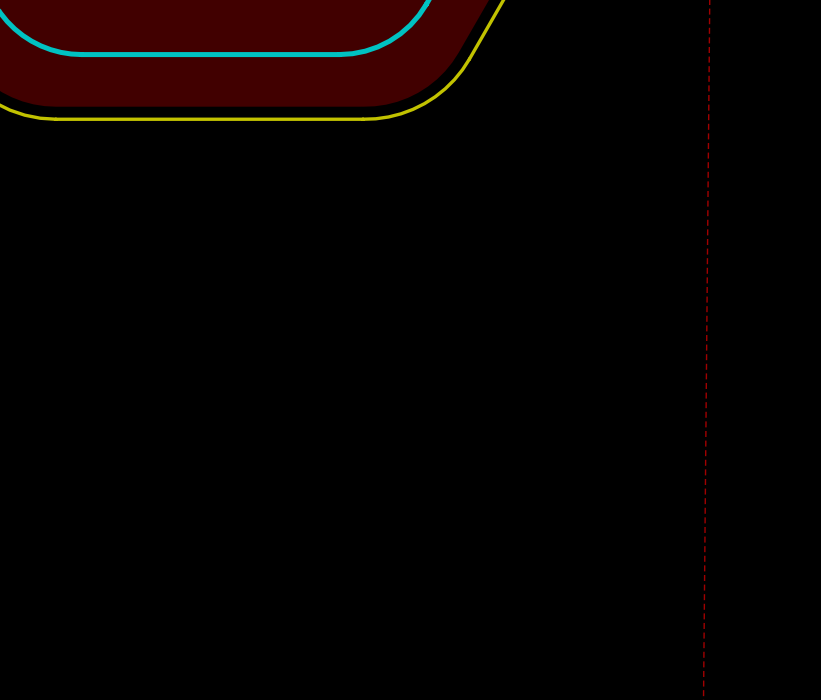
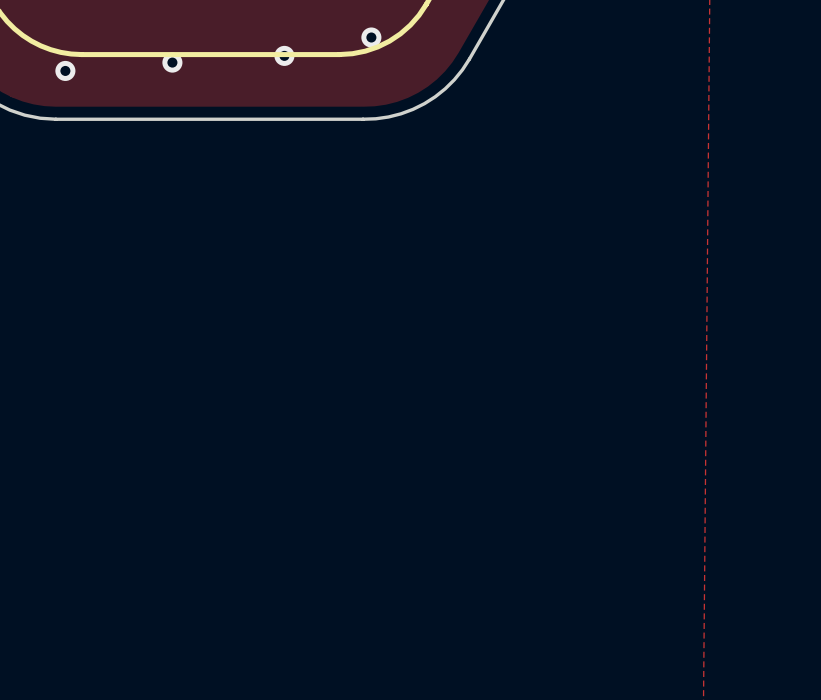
via: none -> (371, 37)
via: none -> (284, 55)
via: none -> (172, 62)
via: none -> (65, 70)

